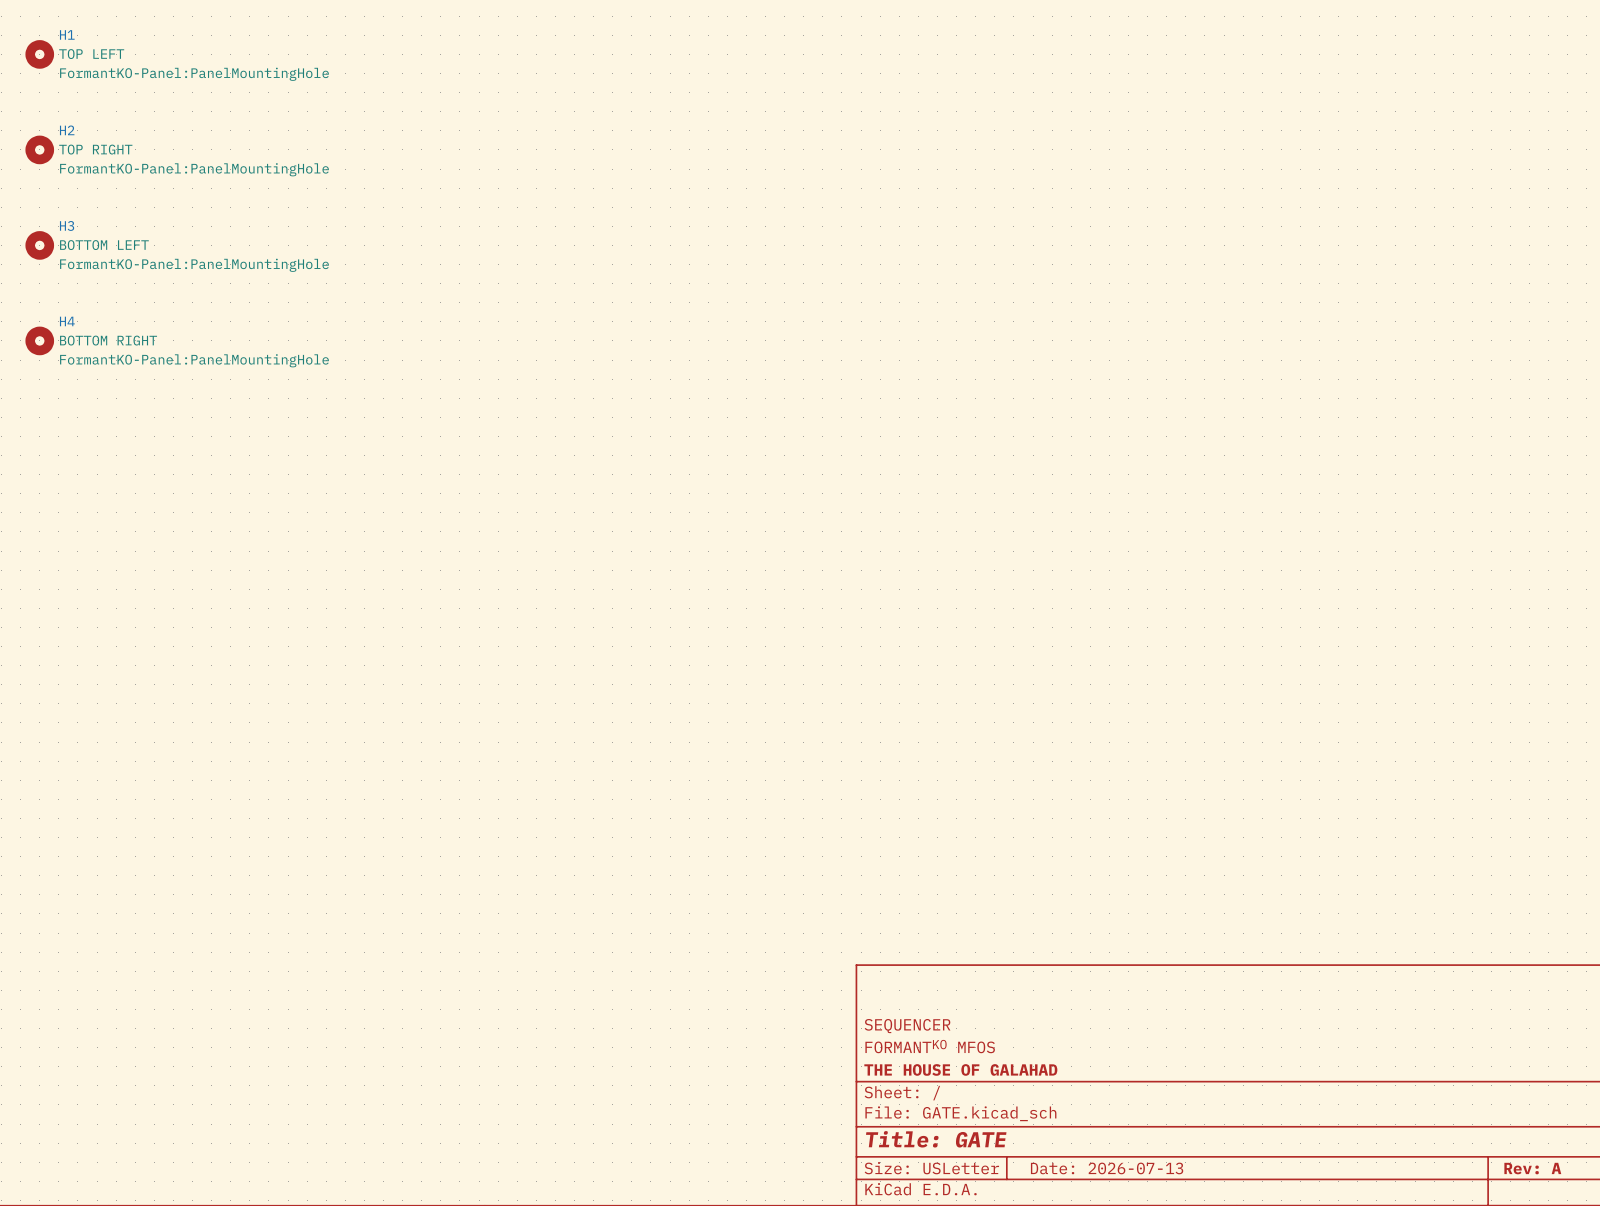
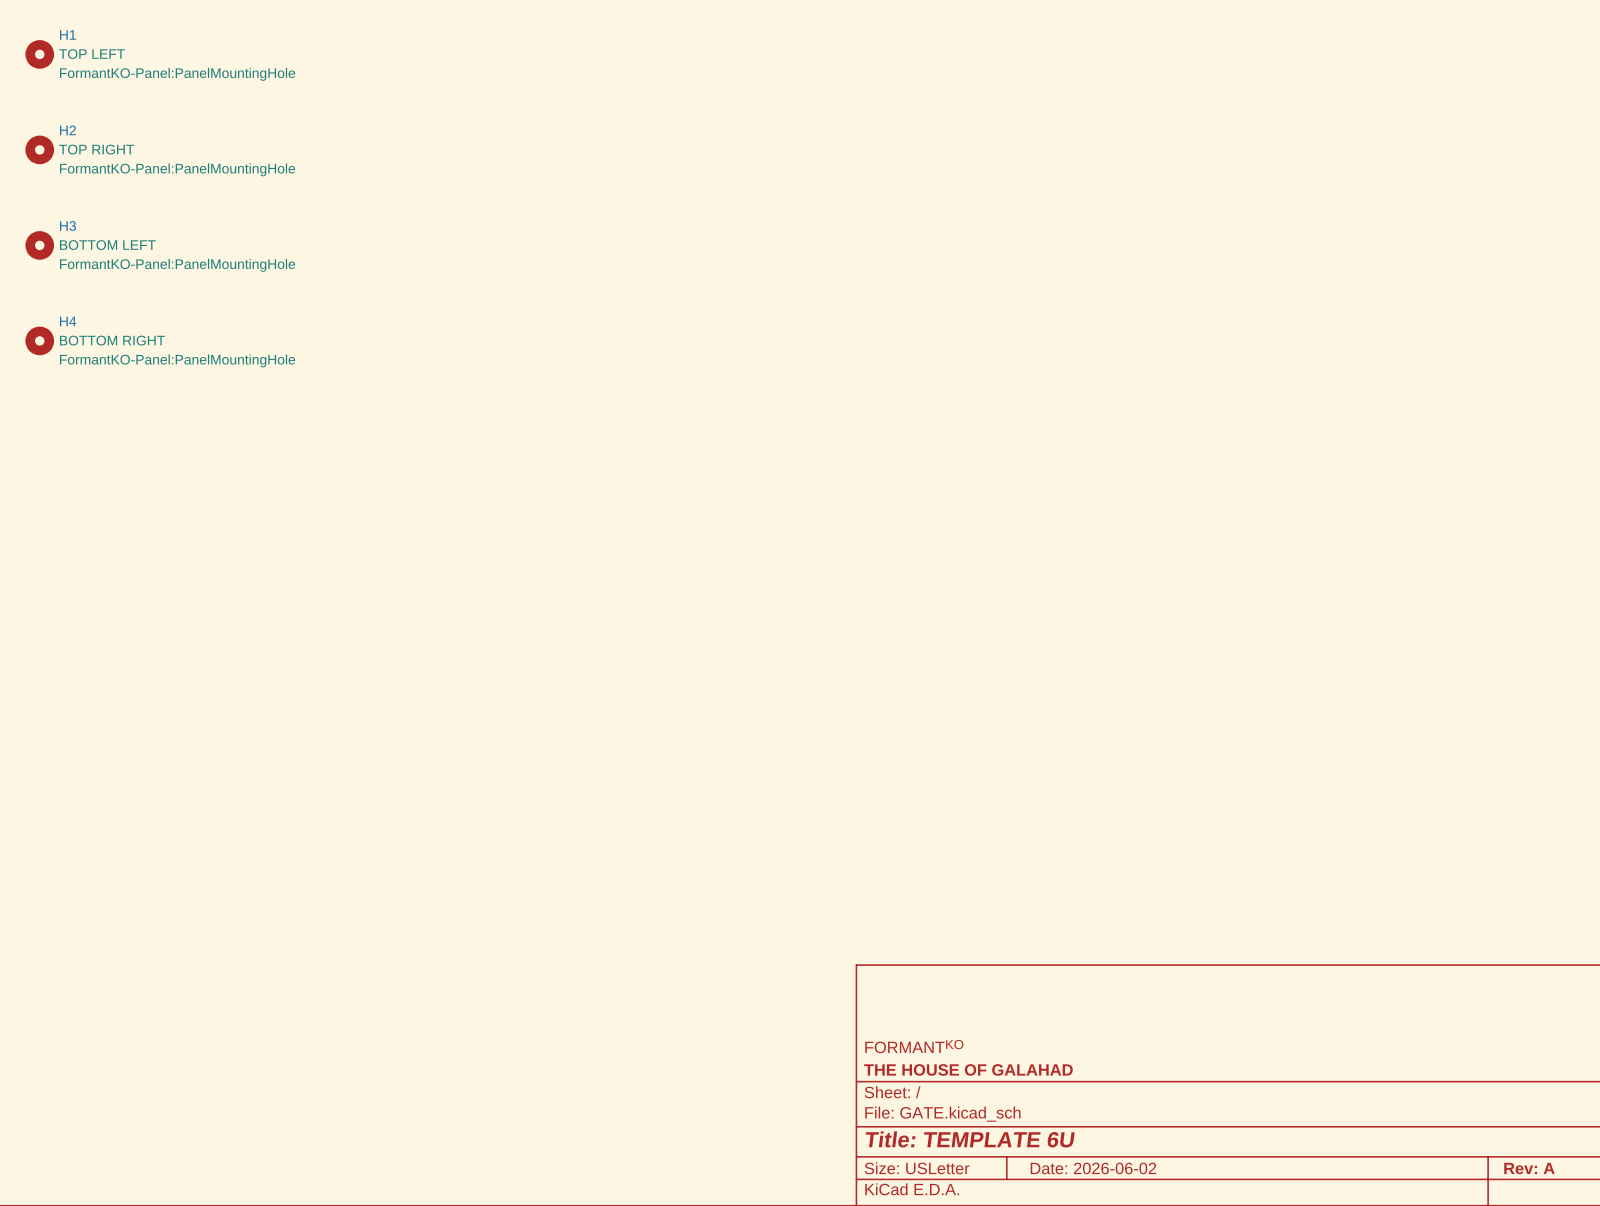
title block: SEQUENCER (907, 1026) -> none
title block: FORMANTKO MFOS (930, 1046) -> FORMANTKO (914, 1046)
title block: Title: GATE (936, 1139) -> Title: TEMPLATE 6U (970, 1139)
title block: Date: 2026-07-13 (1107, 1168) -> Date: 2026-06-02 (1093, 1168)

